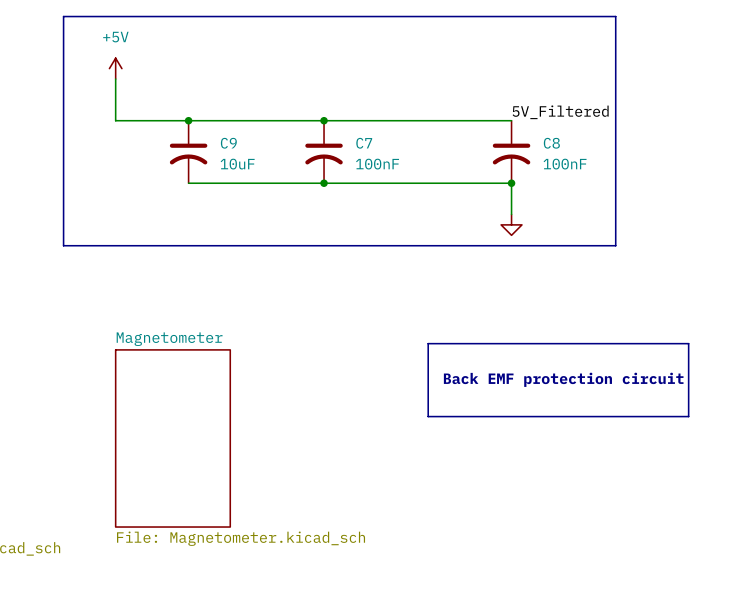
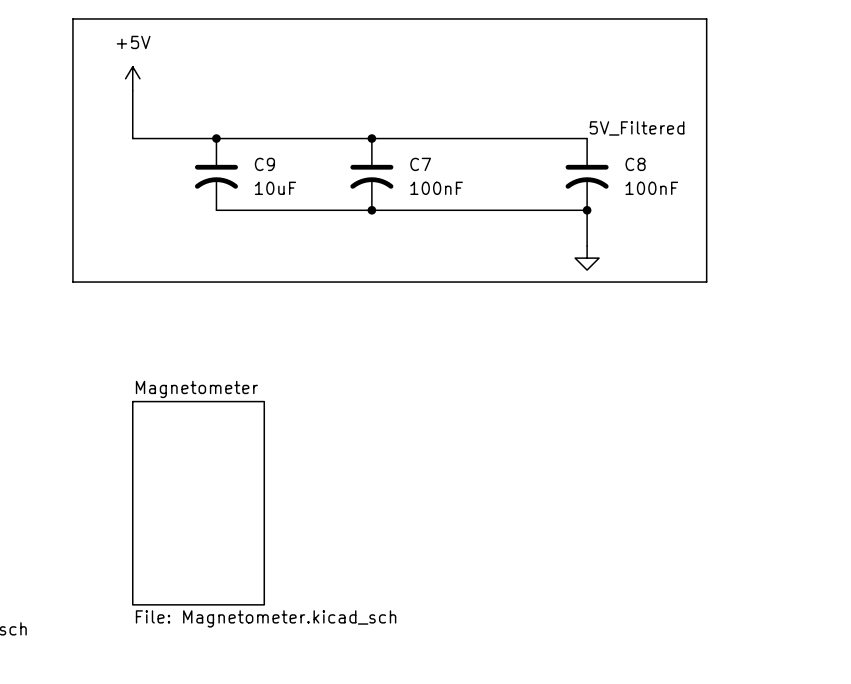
line: (428, 343) (688, 343) (688, 416) (428, 416) (428, 343) -> none
text: Back EMF protection circuit (563, 379) -> none

